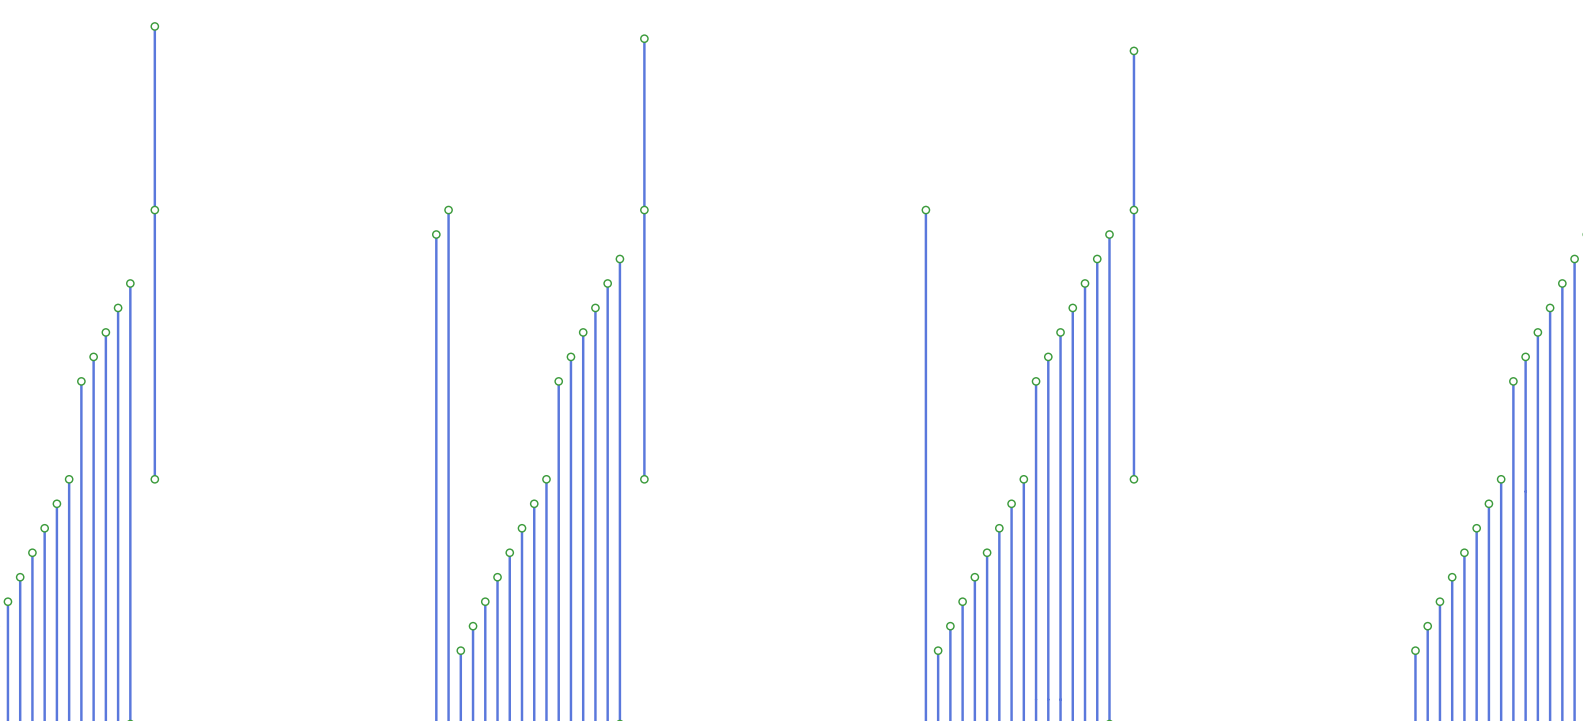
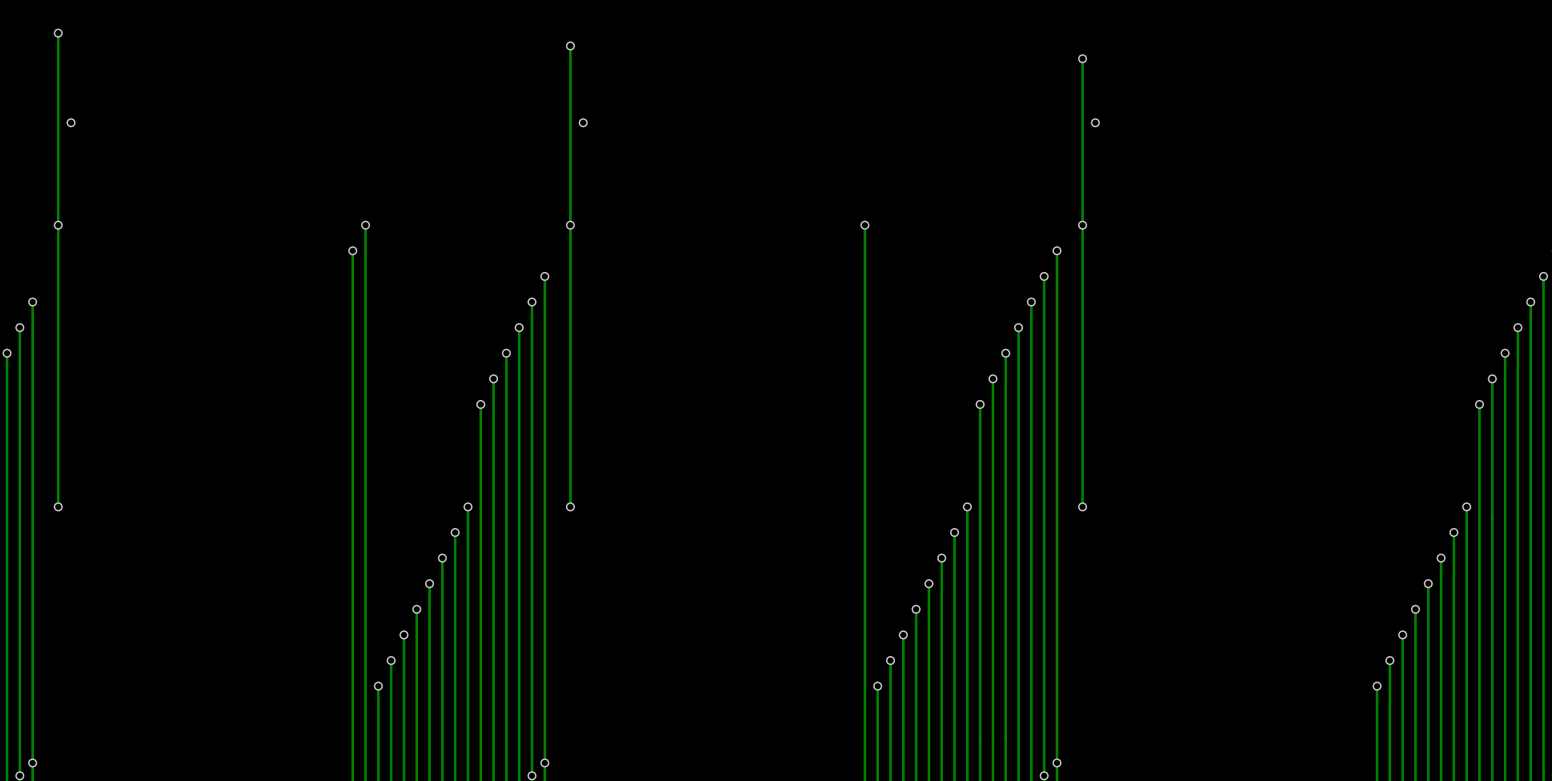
via: none -> (71, 122)
via: none -> (583, 122)
via: none -> (1095, 122)

